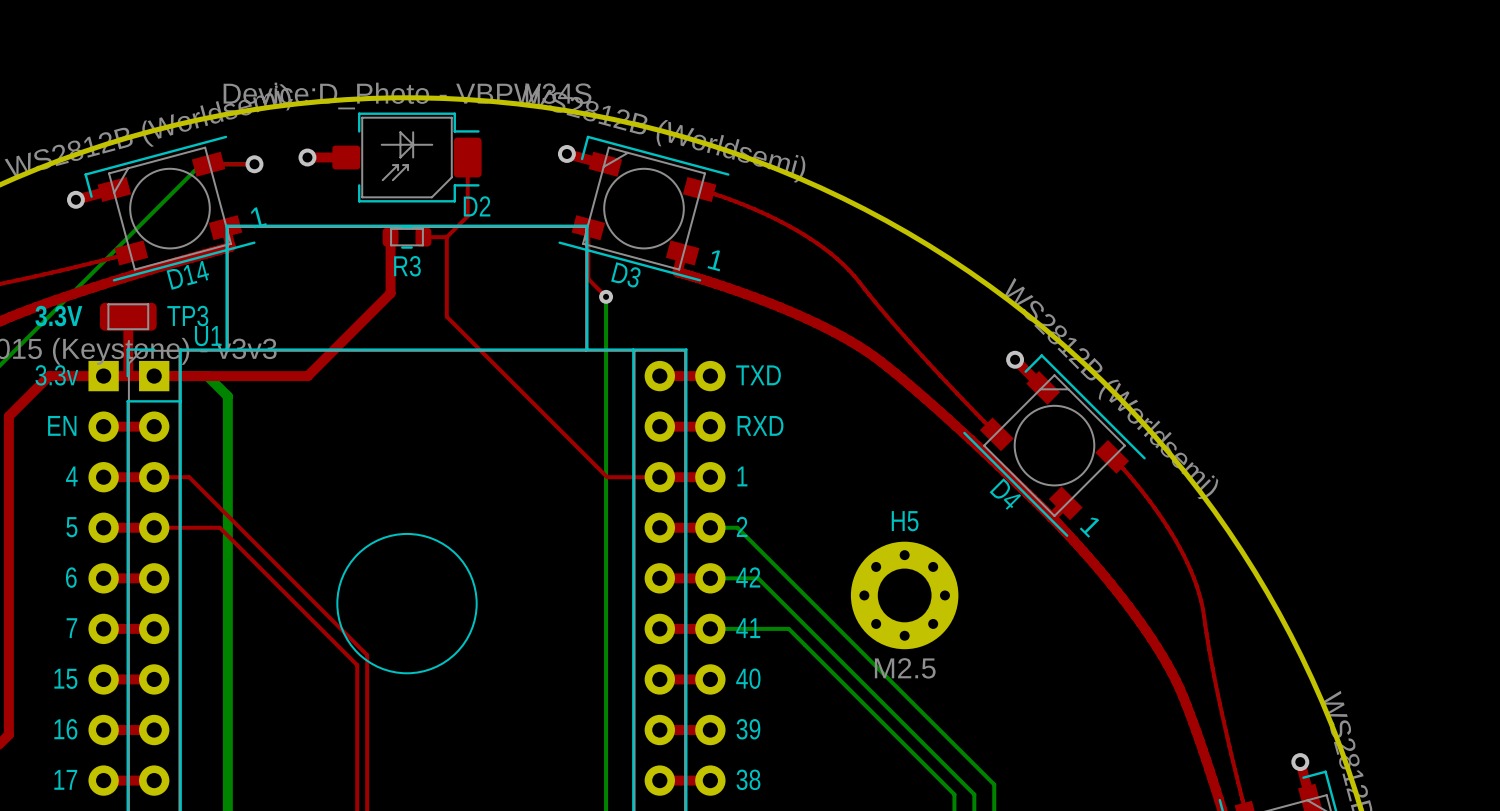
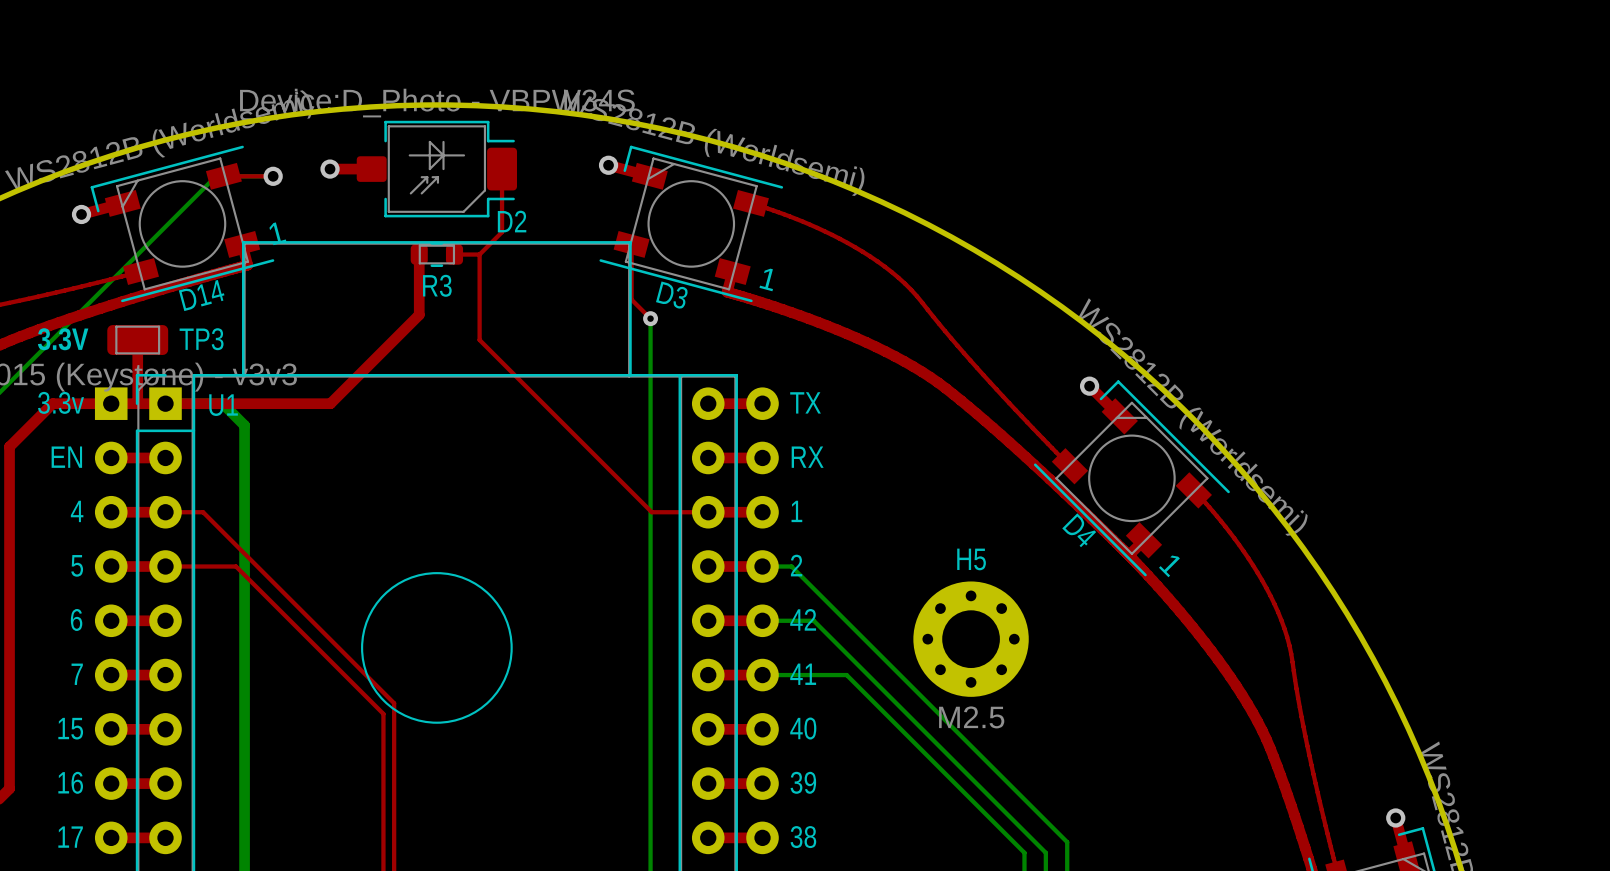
U1 name position: U1 (208, 336) -> U1 (223, 405)
U1 text: TXD (758, 375) -> TX (805, 402)
U1 text: RXD (760, 425) -> RX (807, 457)

